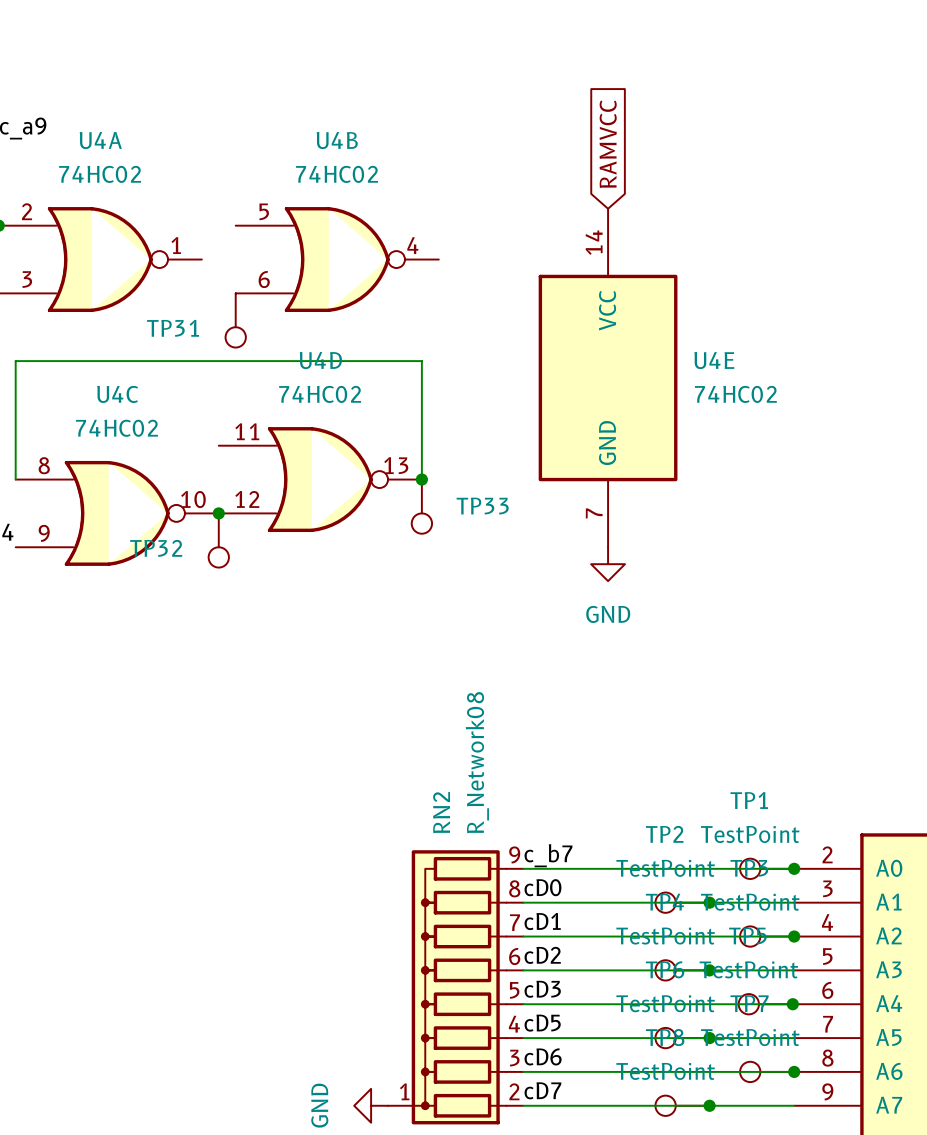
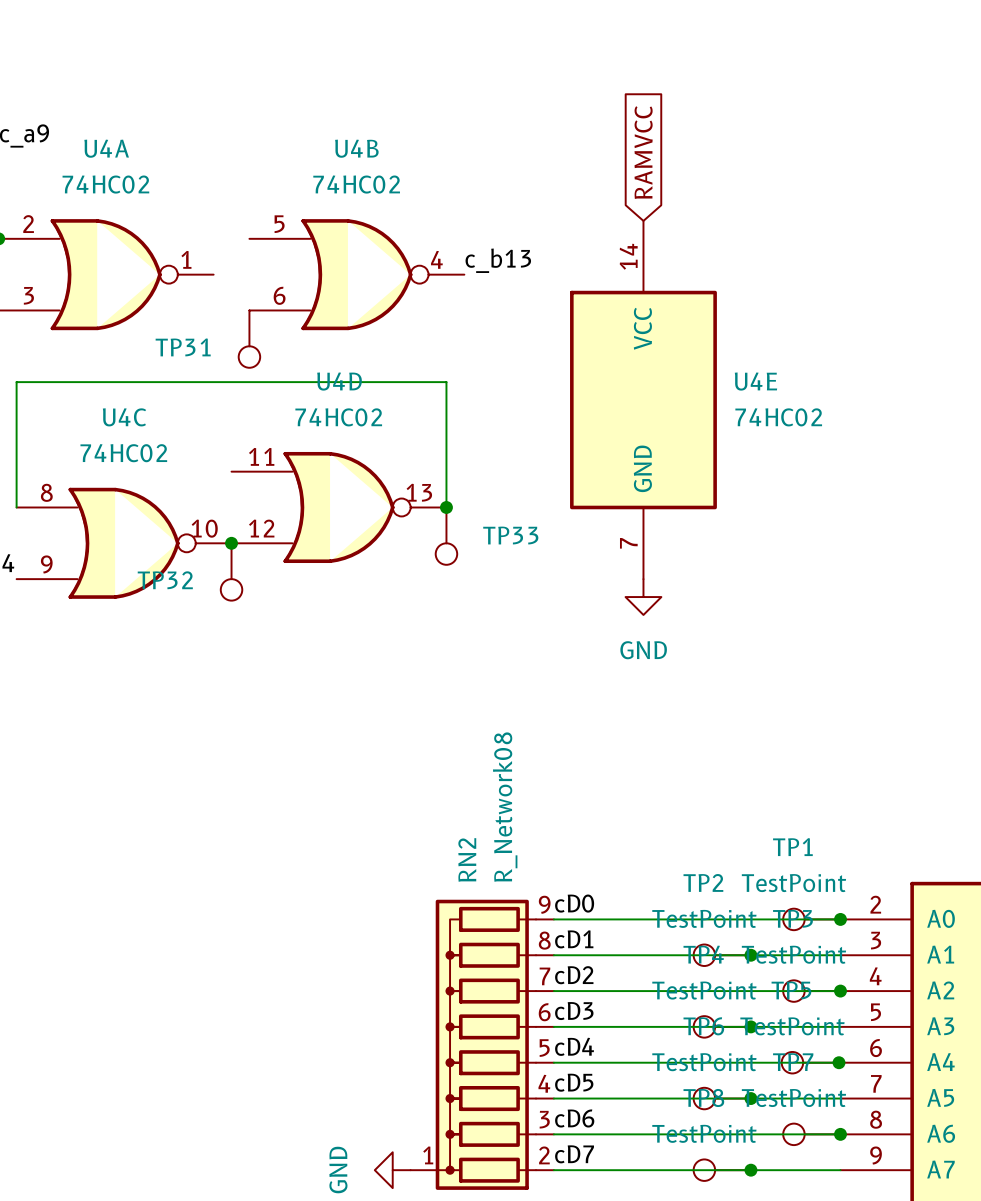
label: none -> c_b13 (498, 260)
label: c_b7 (548, 855) -> cD0 (574, 903)
label: cD0 (542, 887) -> cD1 (574, 939)
label: cD1 (542, 921) -> cD2 (574, 975)
label: cD2 (542, 955) -> cD3 (574, 1011)
label: cD3 (542, 989) -> cD4 (574, 1046)

